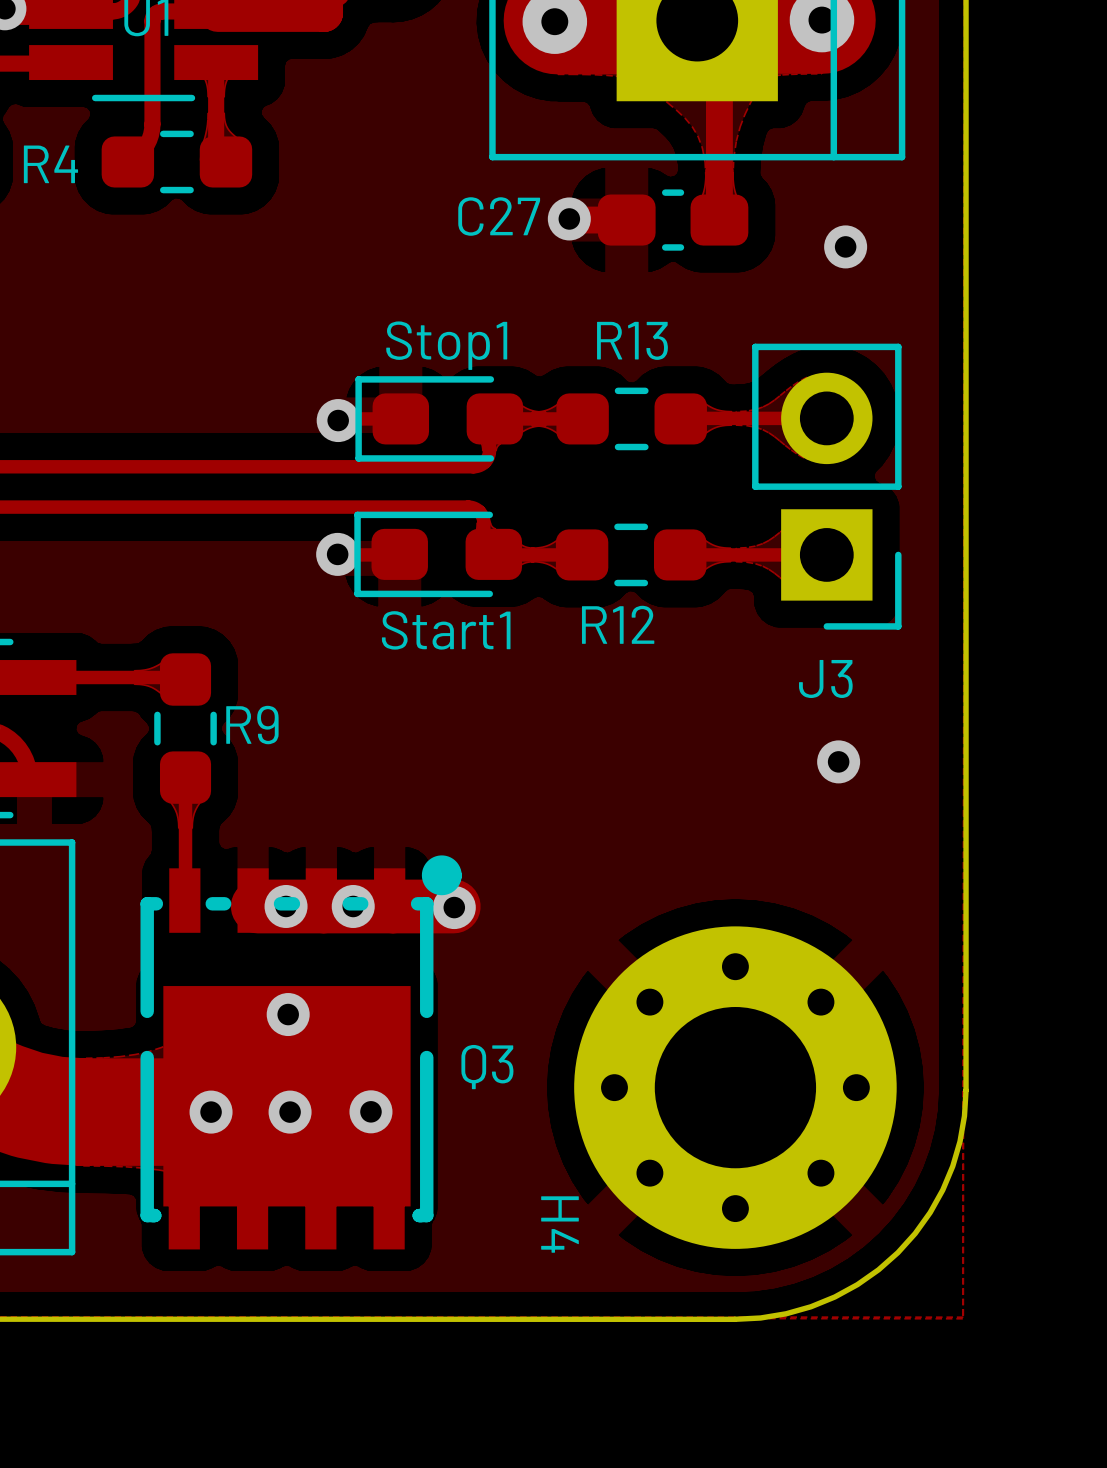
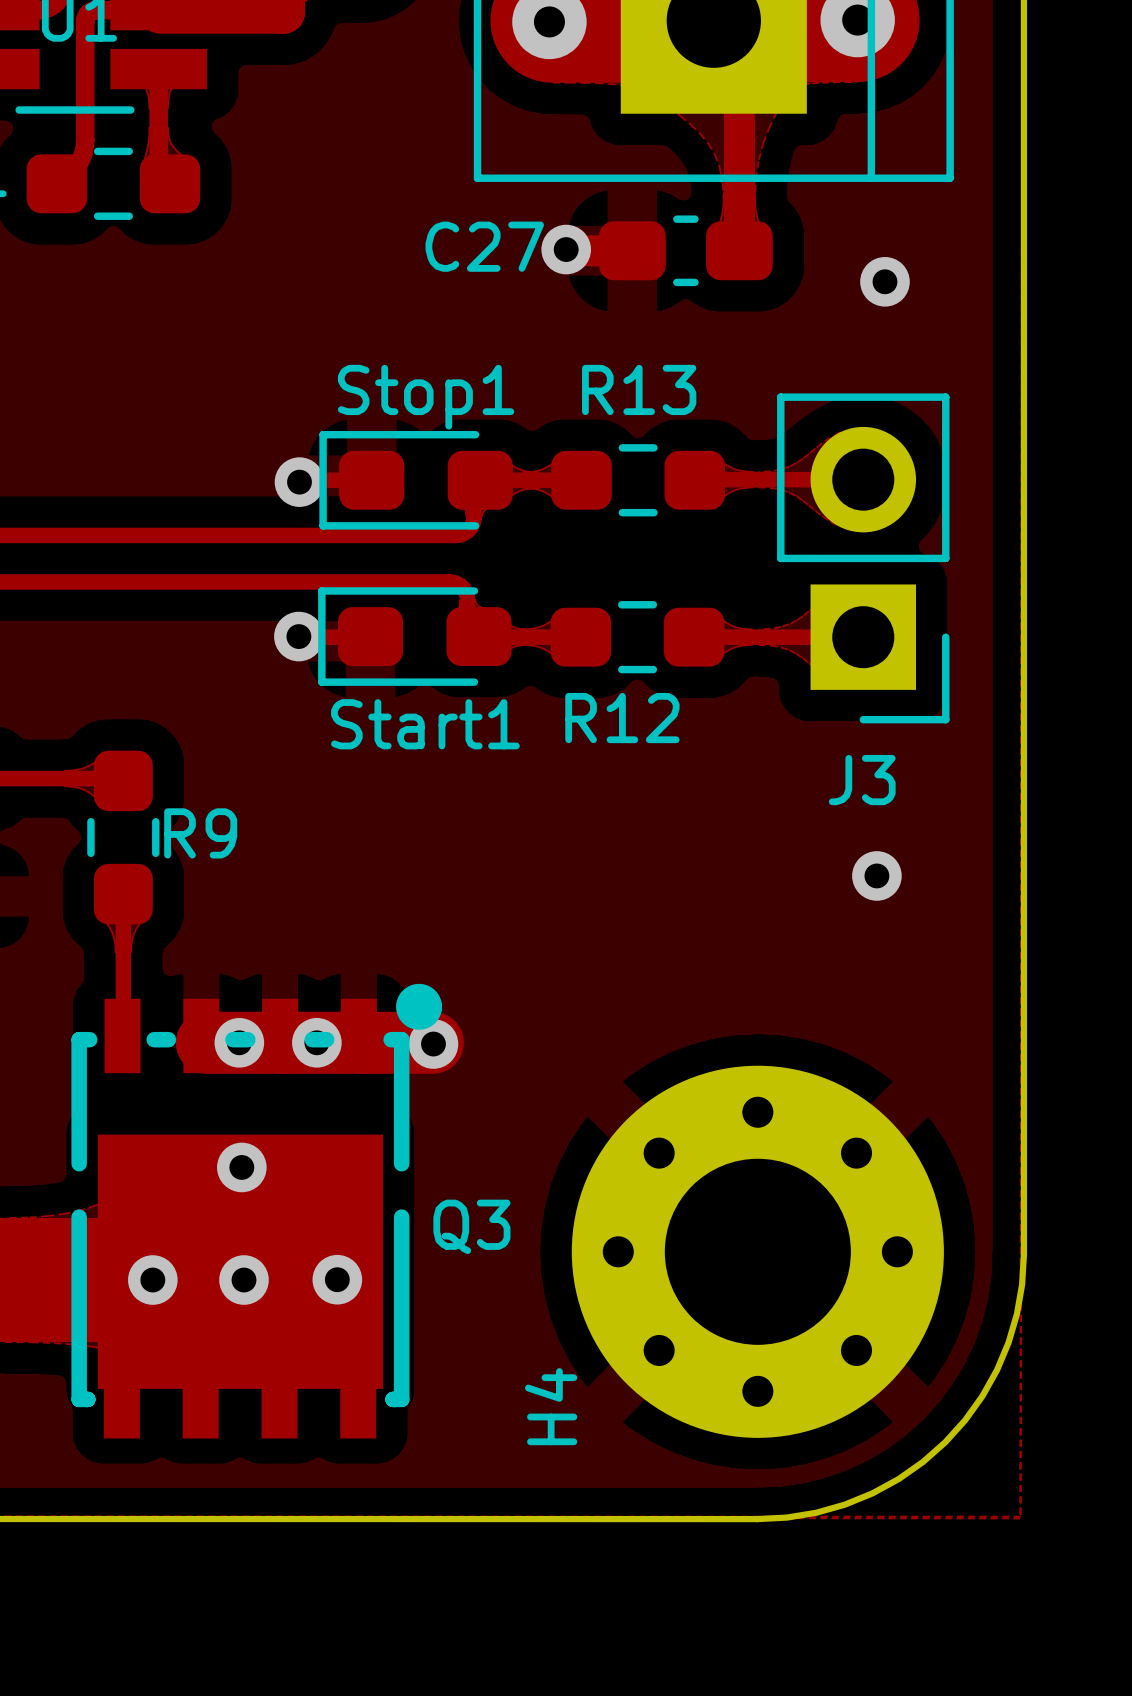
H4 name rotation: 0° (559, 1224) -> 180° (551, 1406)

